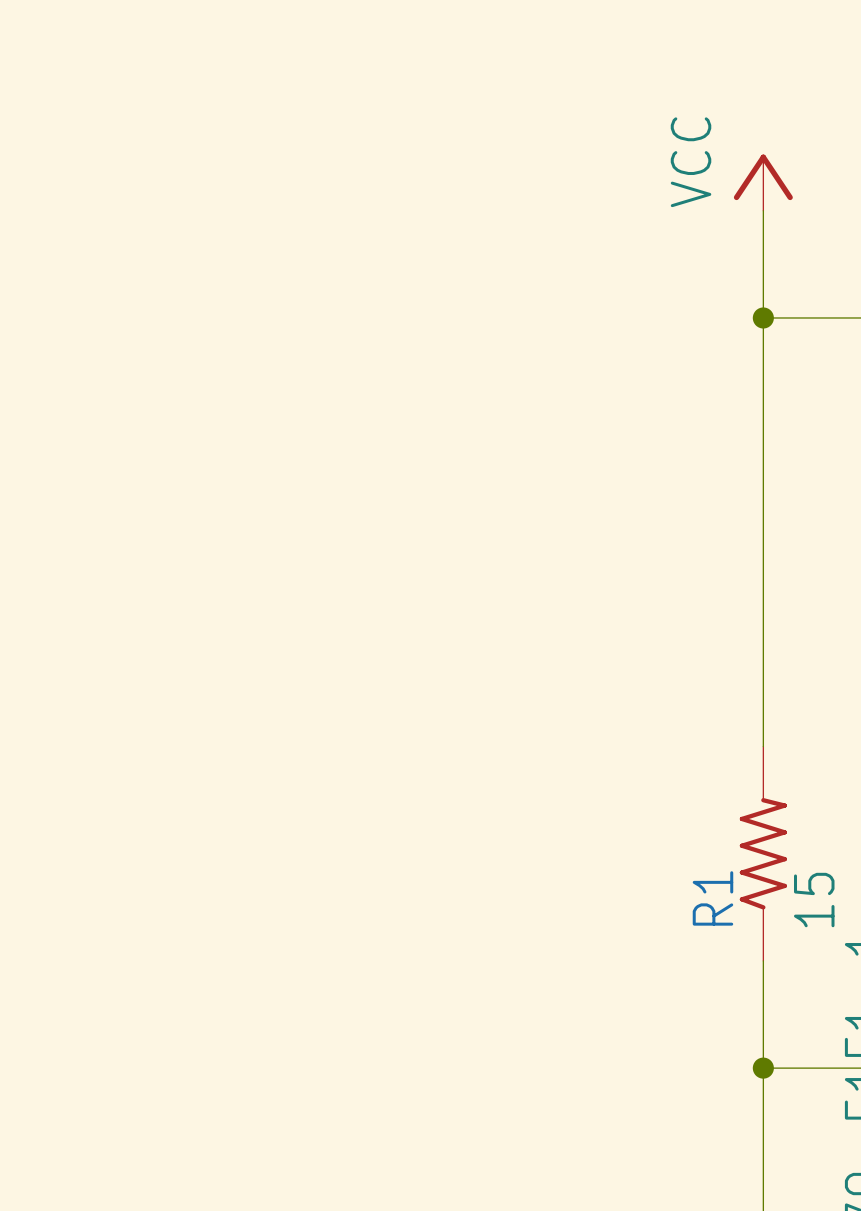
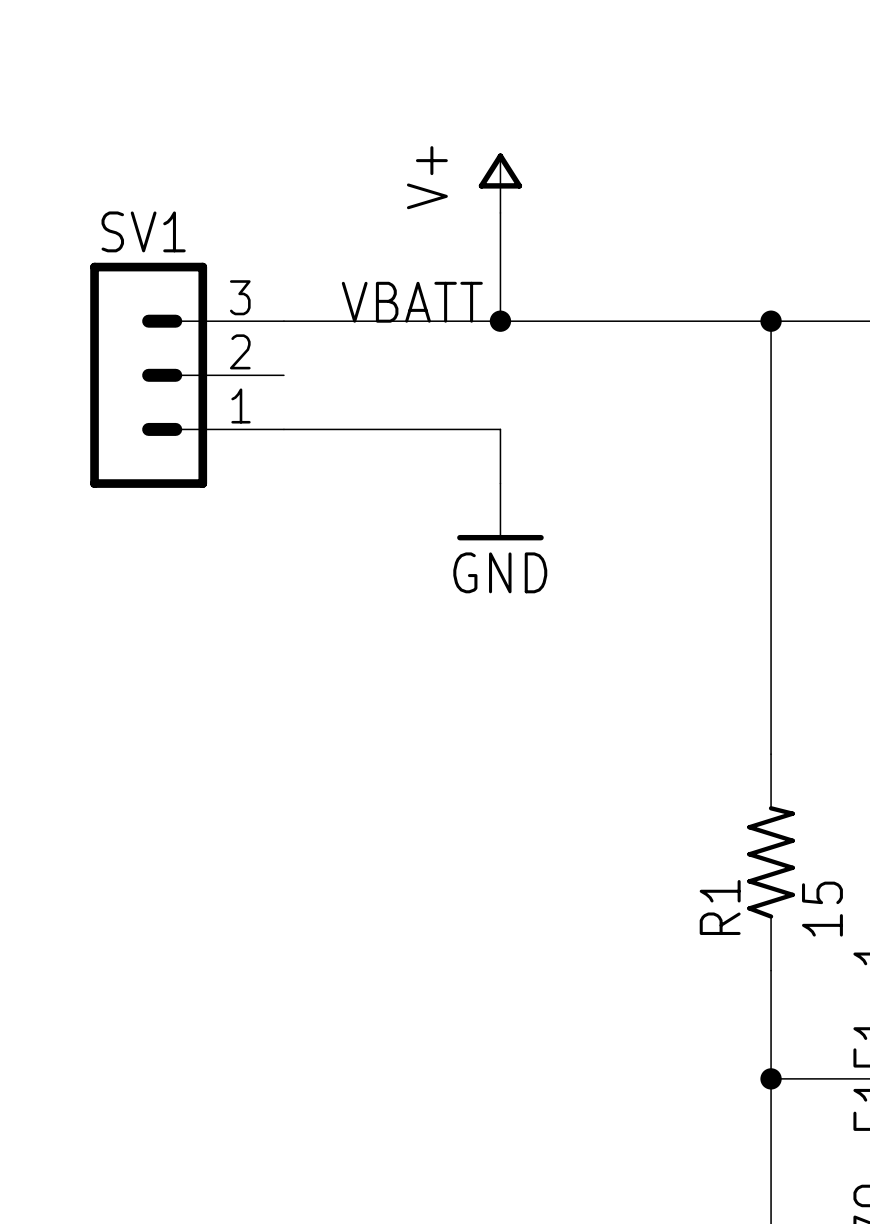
power symbol: none -> V+ (500, 183)
power symbol: VCC (763, 182) -> none
wire: none -> (500, 212) (500, 321)
wire: (763, 210) (763, 317) -> (283, 321) (771, 321)
label: none -> VBATT (412, 302)
junction: none -> (500, 321)
SV1: none -> (187, 375)
wire: none -> (283, 429) (500, 429) (500, 483)
power symbol: none -> GND (500, 511)

